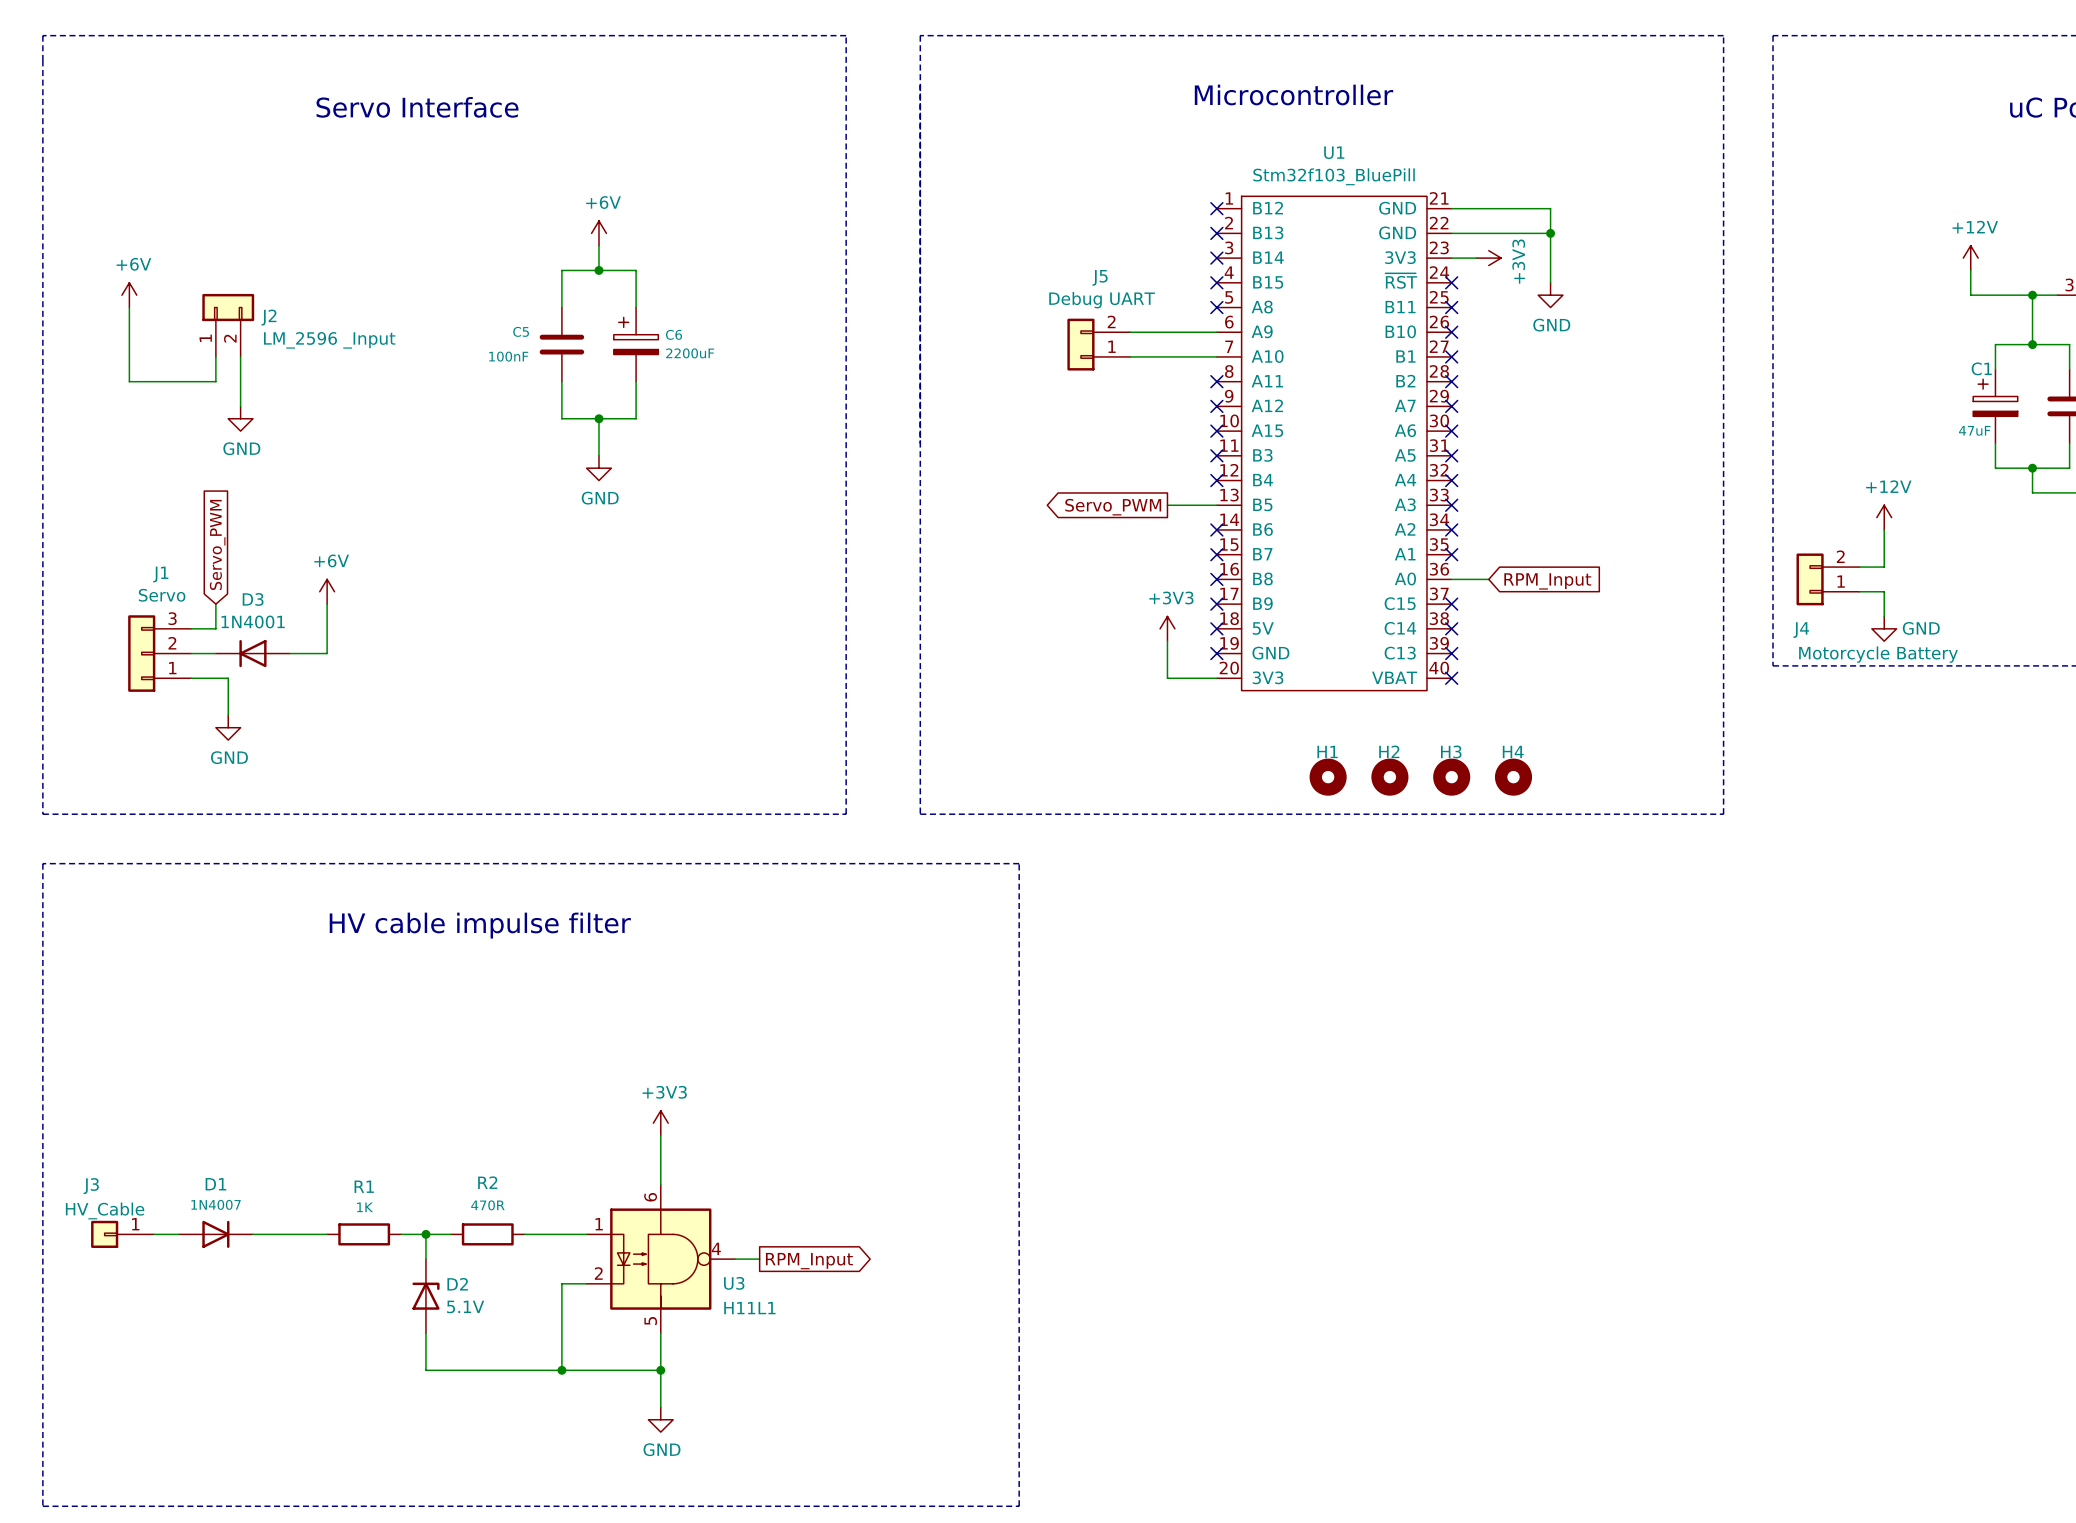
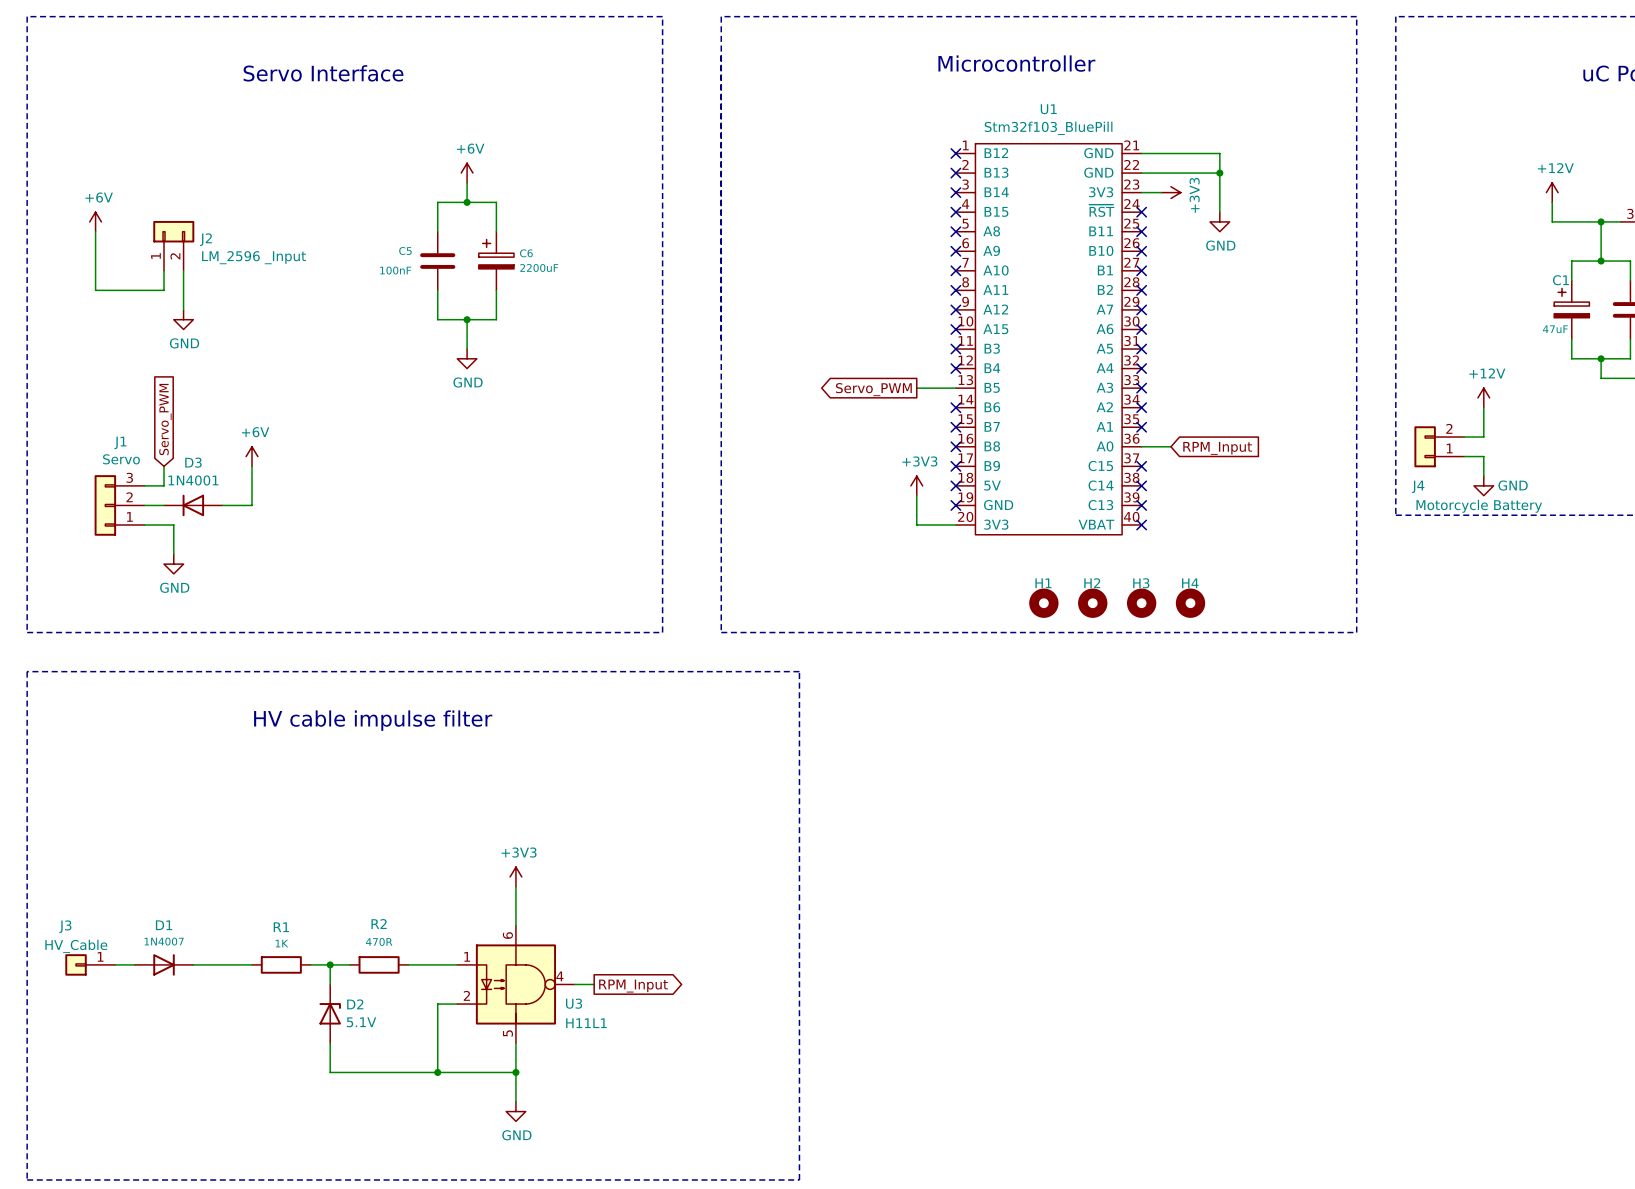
wire: (1130, 332) (1216, 332) -> none
no-connect mark: none -> (955, 251)
J5: Debug UART (1098, 344) -> none
wire: (1130, 356) (1216, 356) -> none
no-connect mark: none -> (955, 270)

